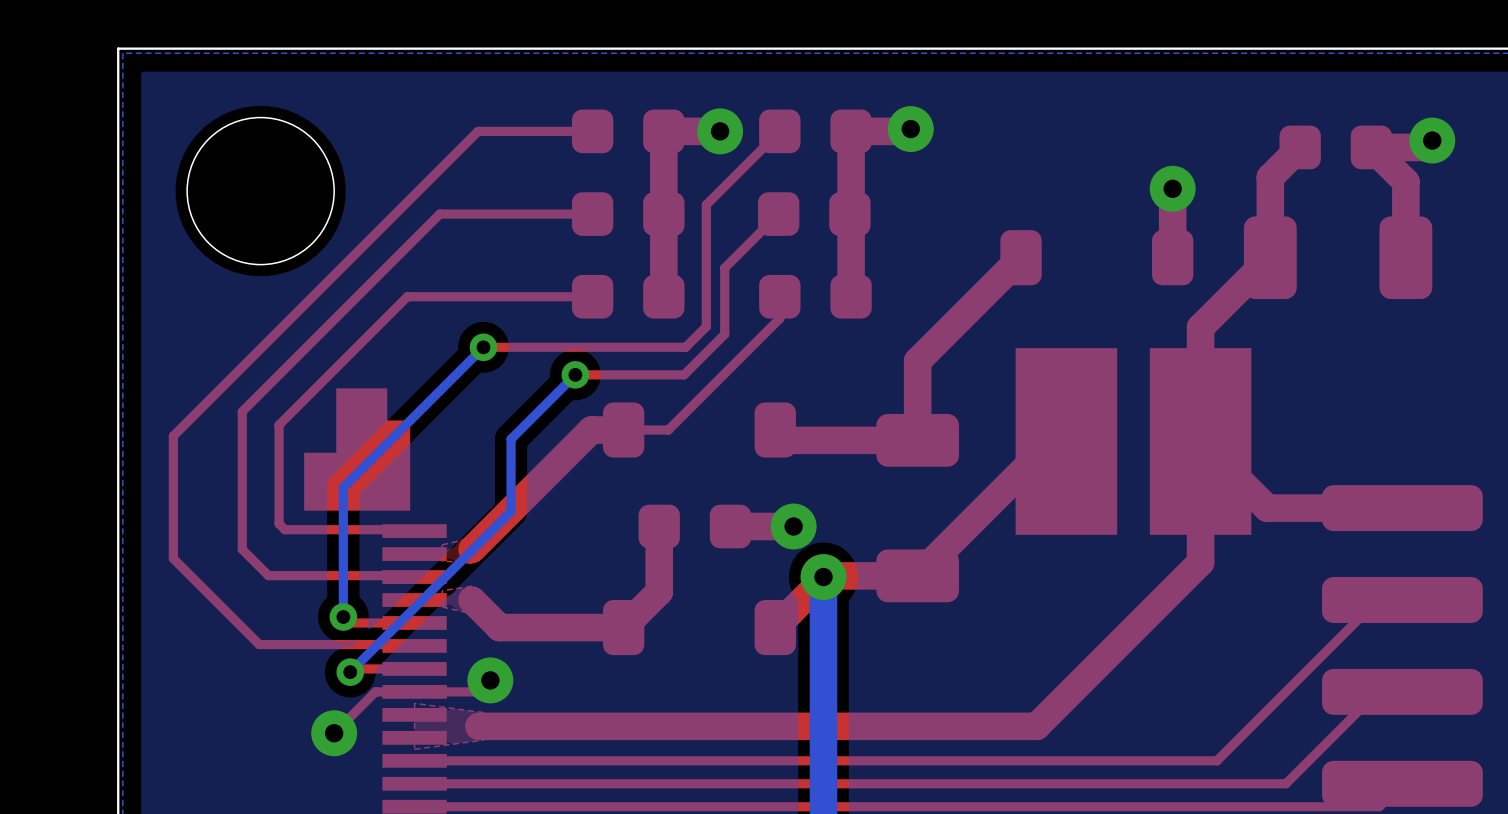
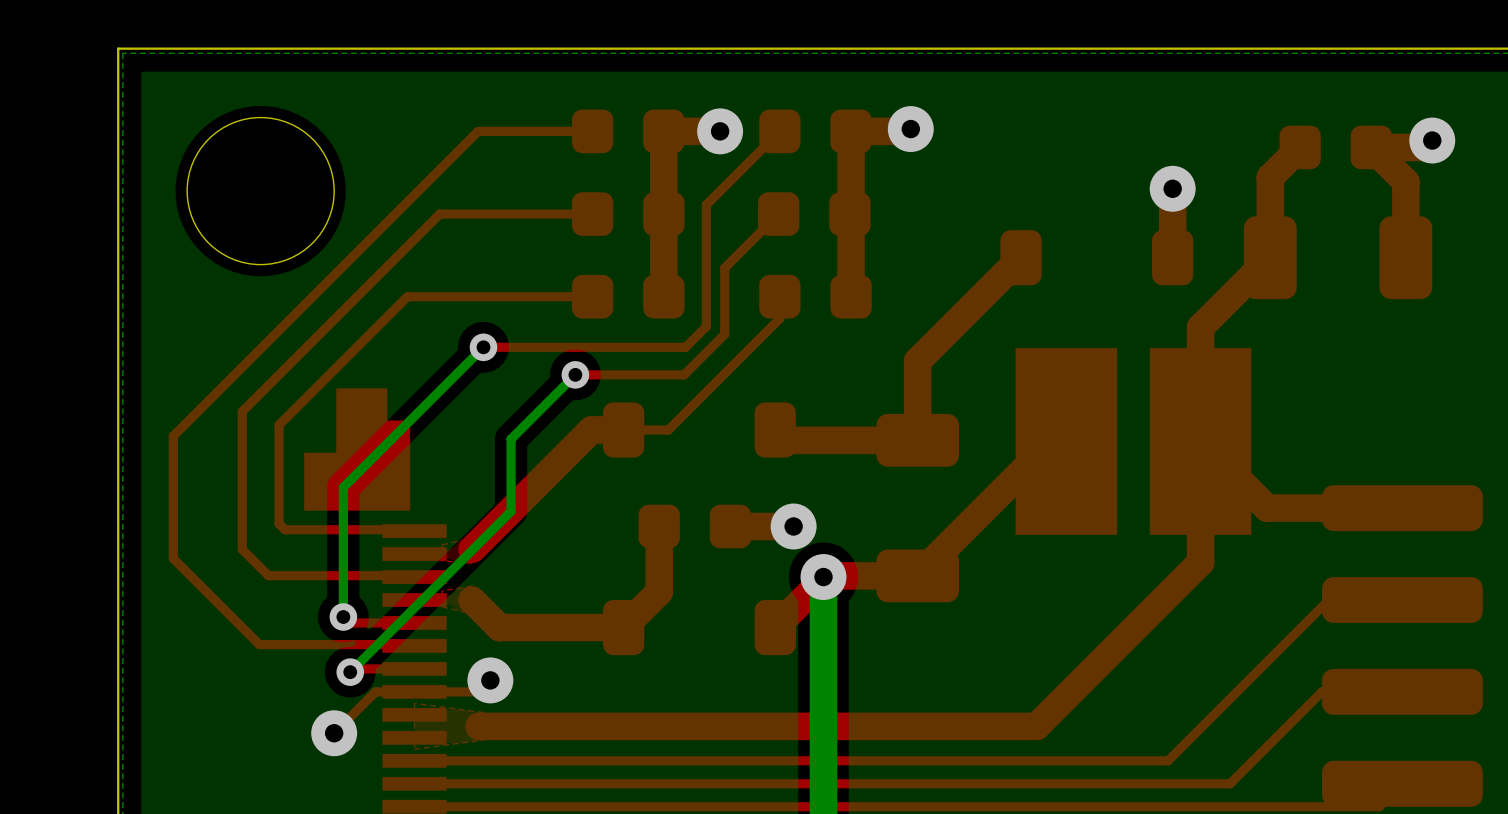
top track: (1377, 600) (1216, 760) (1168, 760) -> (1377, 600) (1328, 600) (1168, 760)
top track: (1377, 691) (1285, 783) (1230, 783) -> (1377, 691) (1322, 691) (1230, 783)

